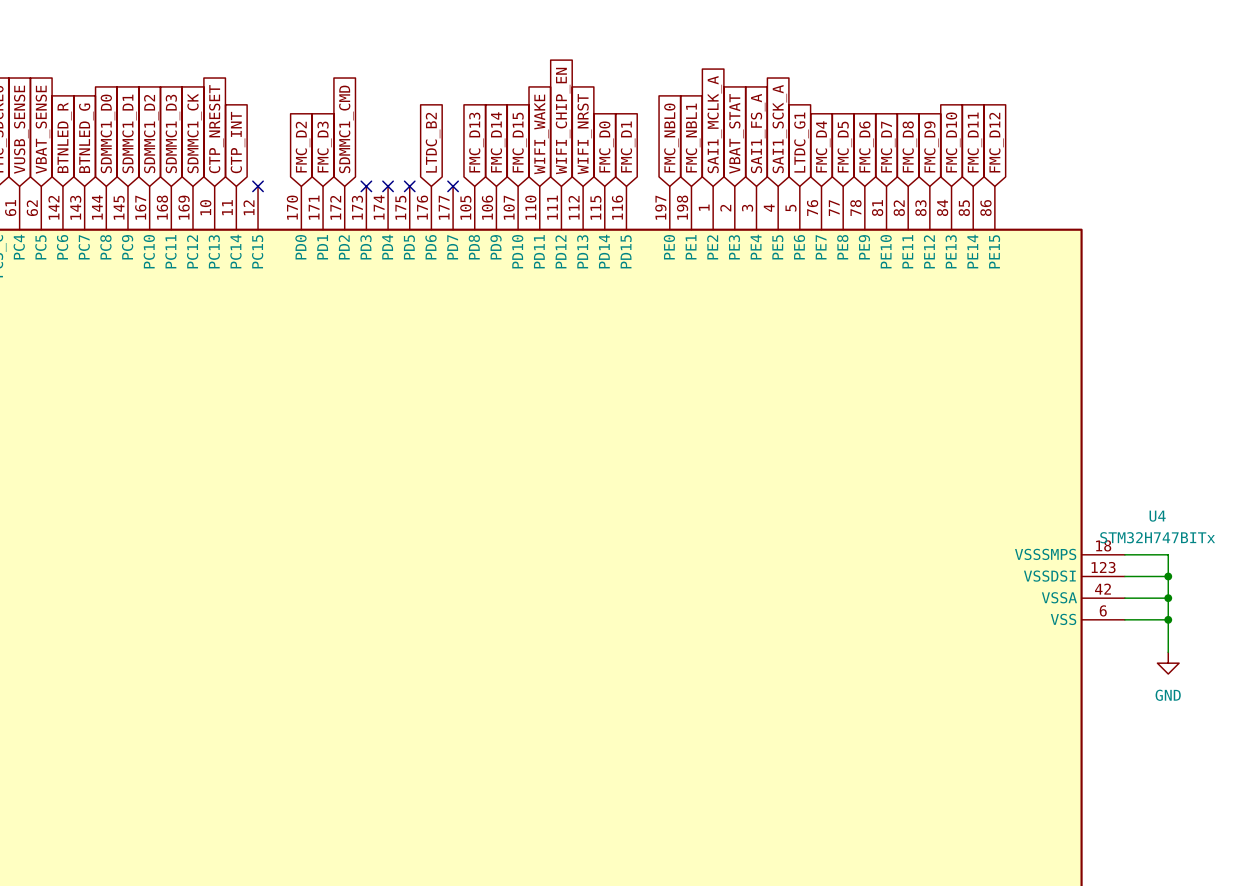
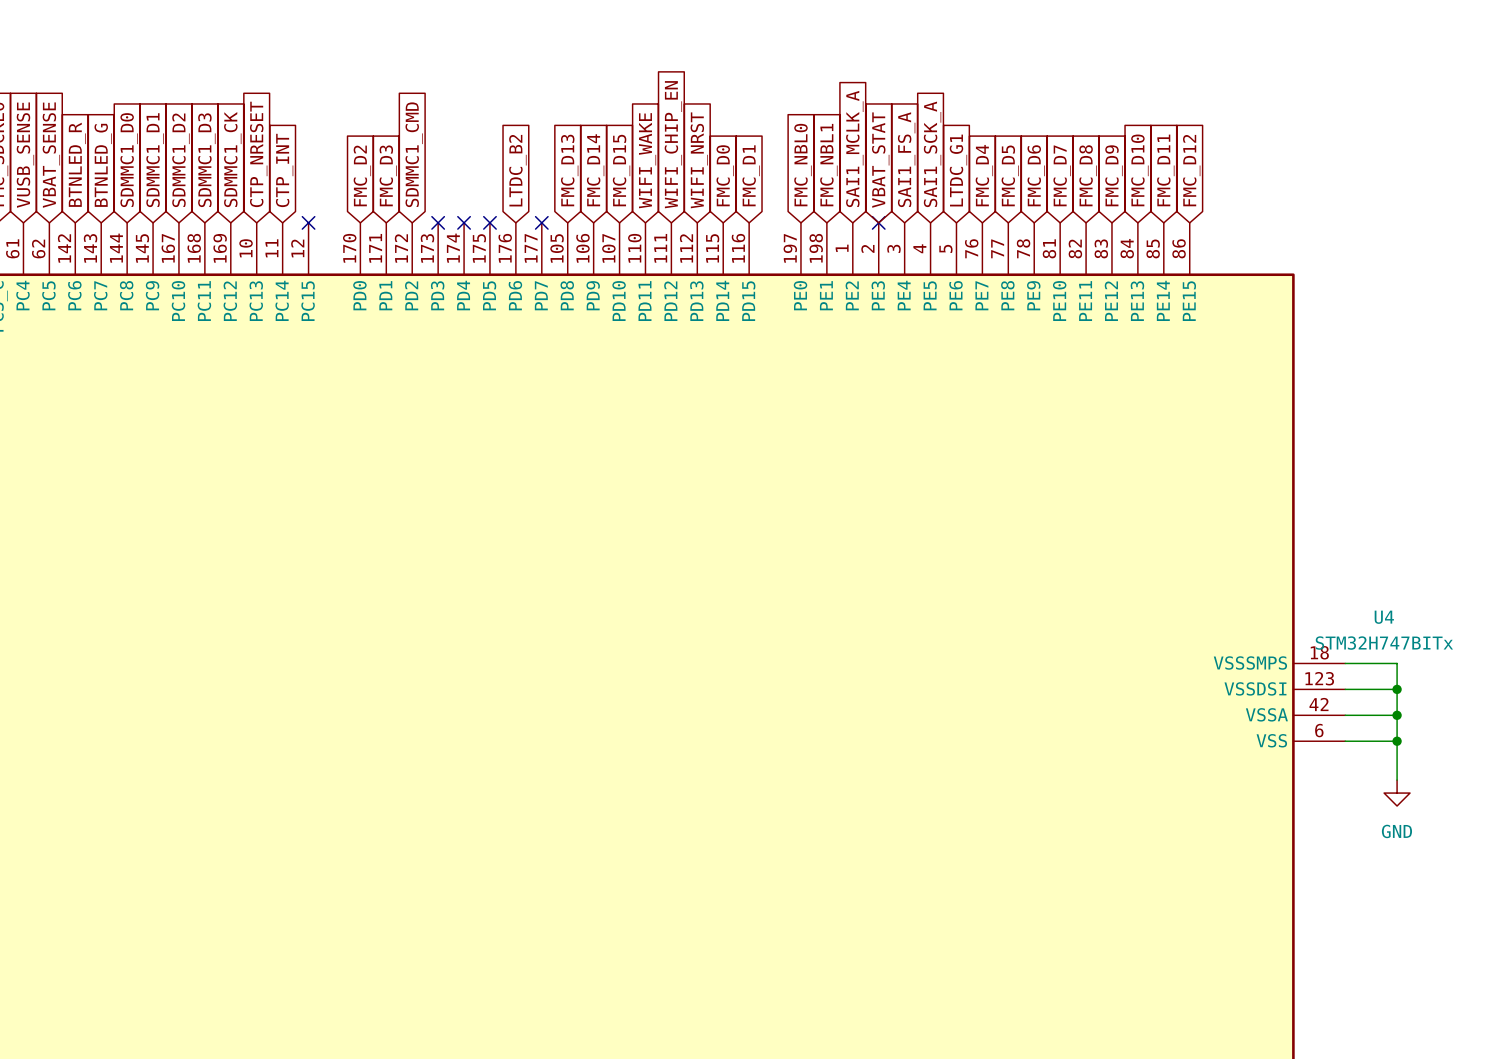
no-connect mark: none -> (878, 222)

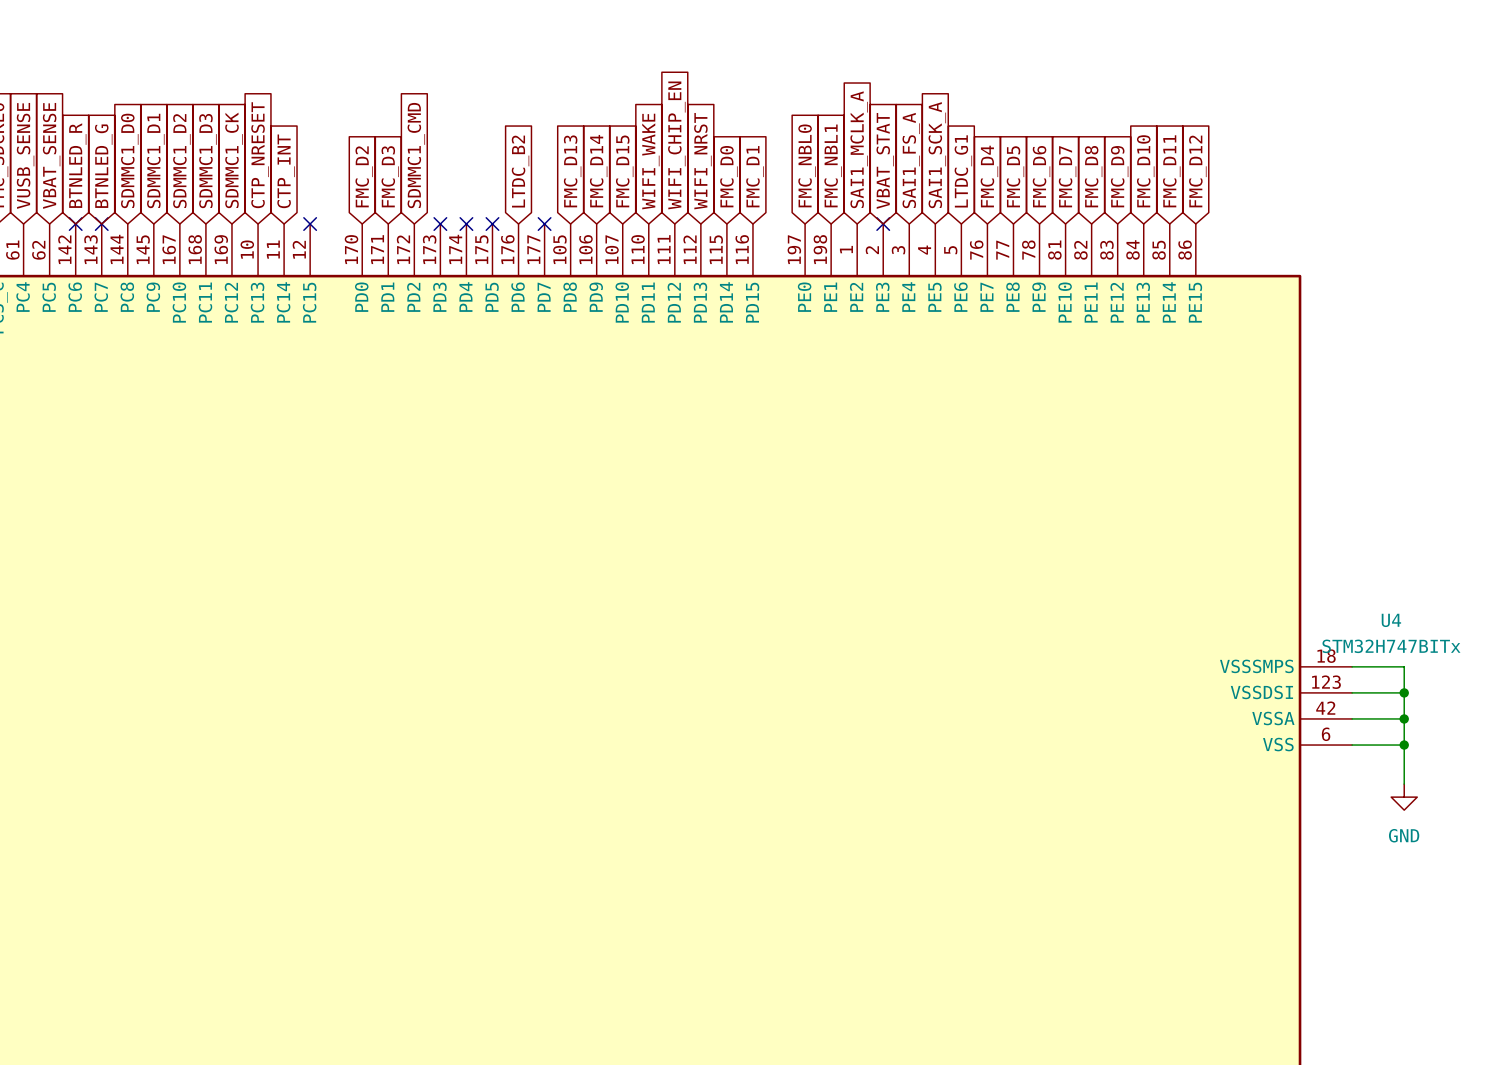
no-connect mark: none -> (75, 224)
no-connect mark: none -> (101, 224)

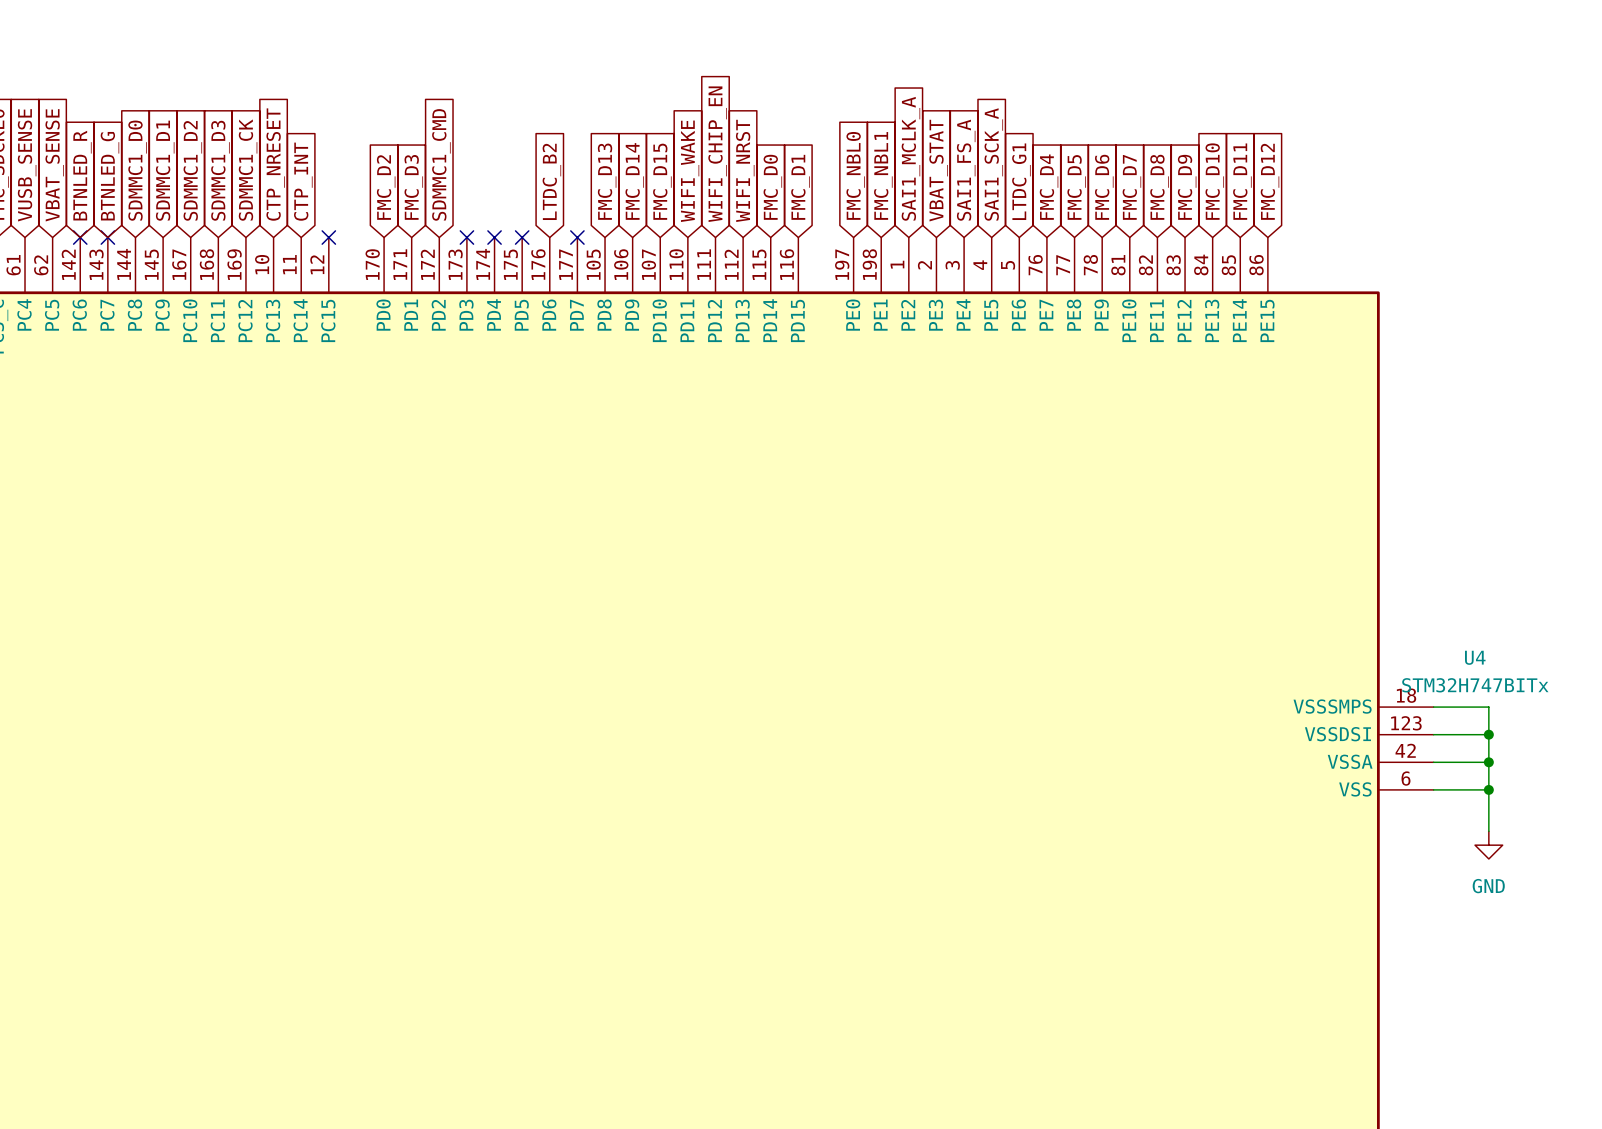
no-connect mark: (883, 224) -> none

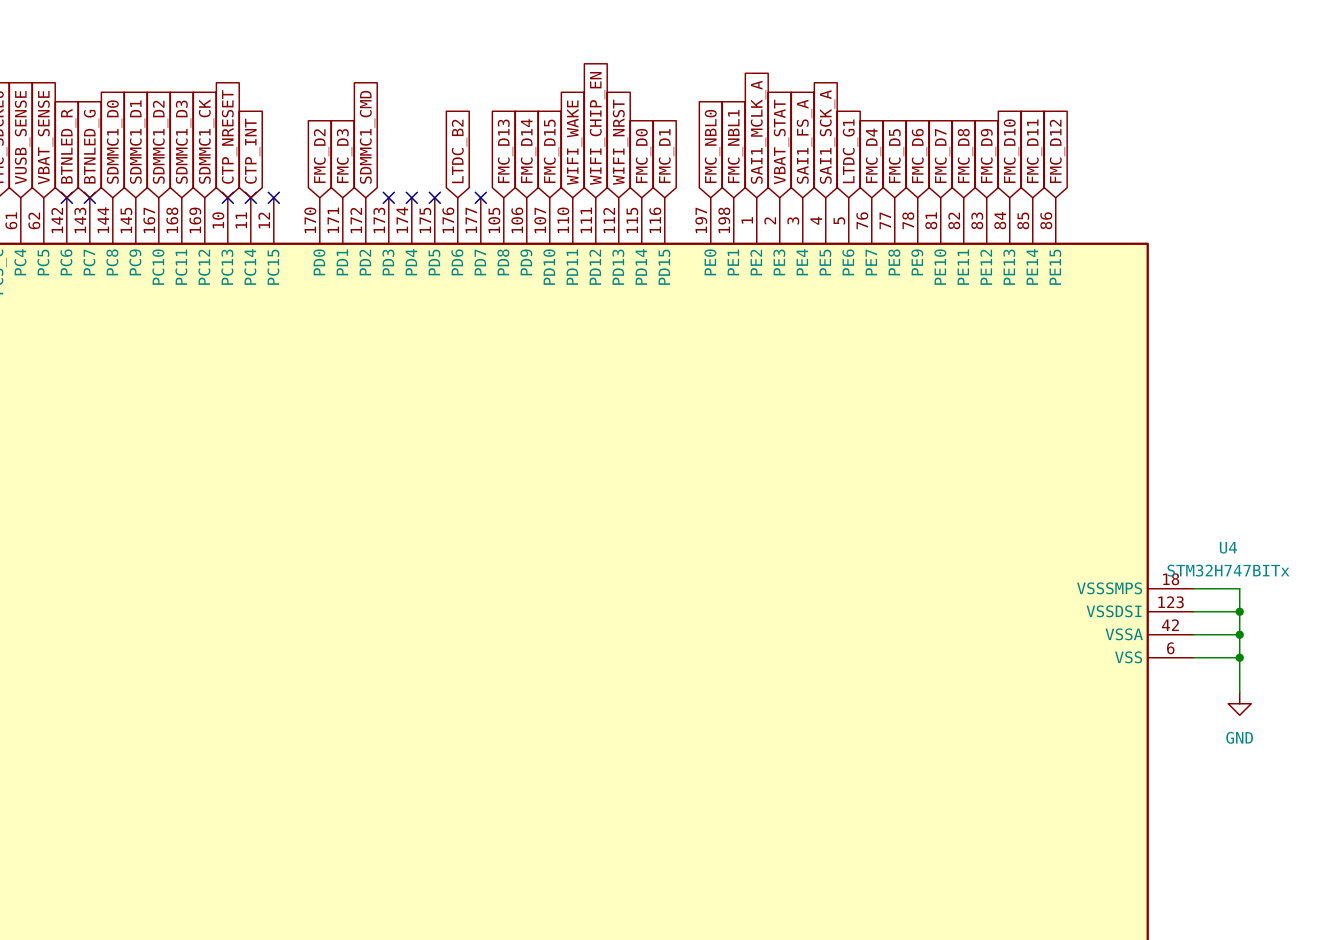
no-connect mark: none -> (227, 197)
no-connect mark: none -> (250, 197)

